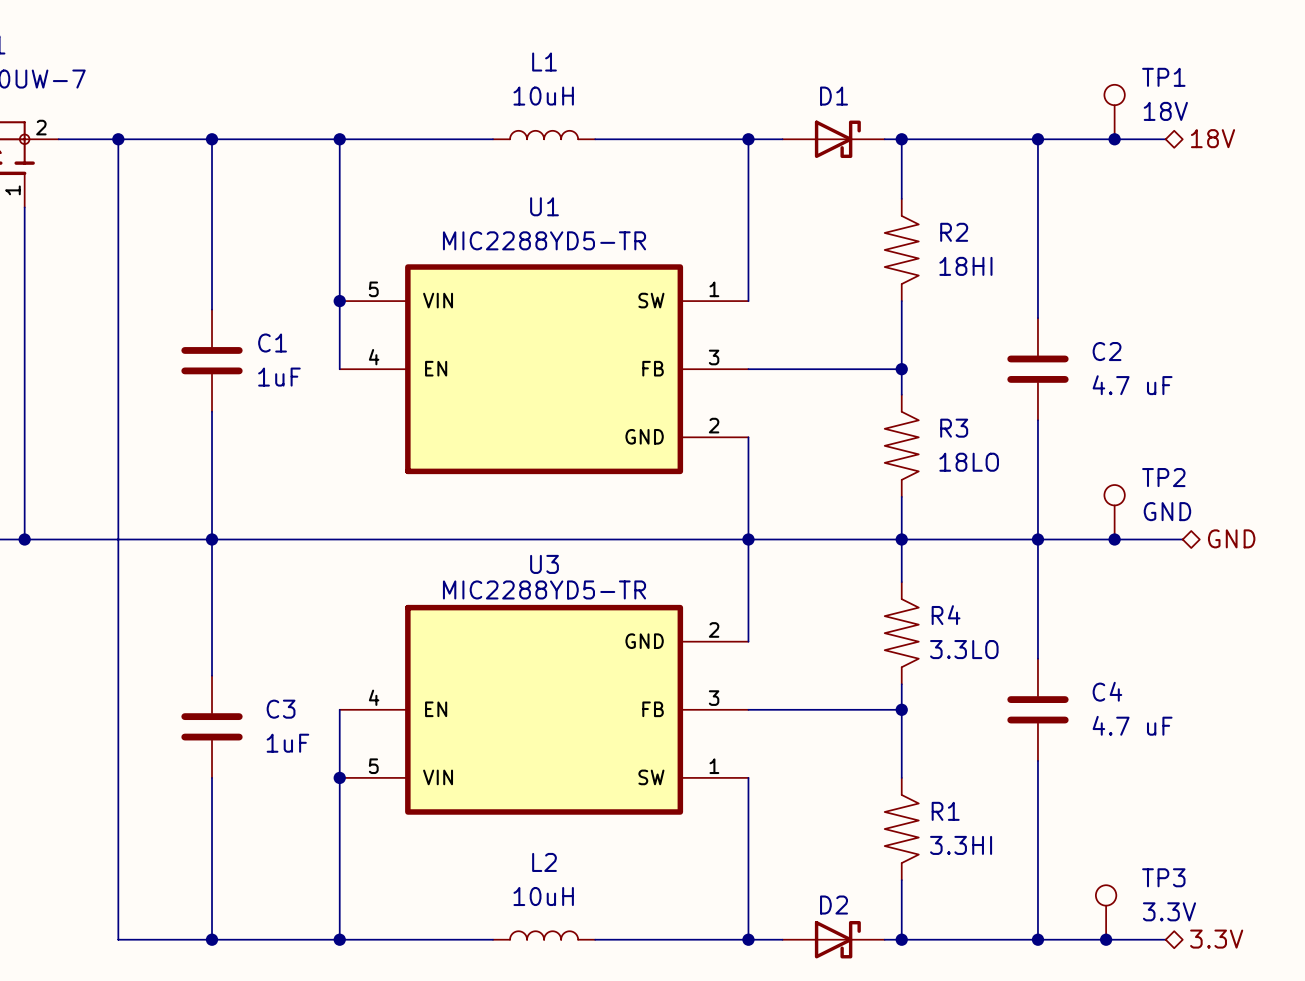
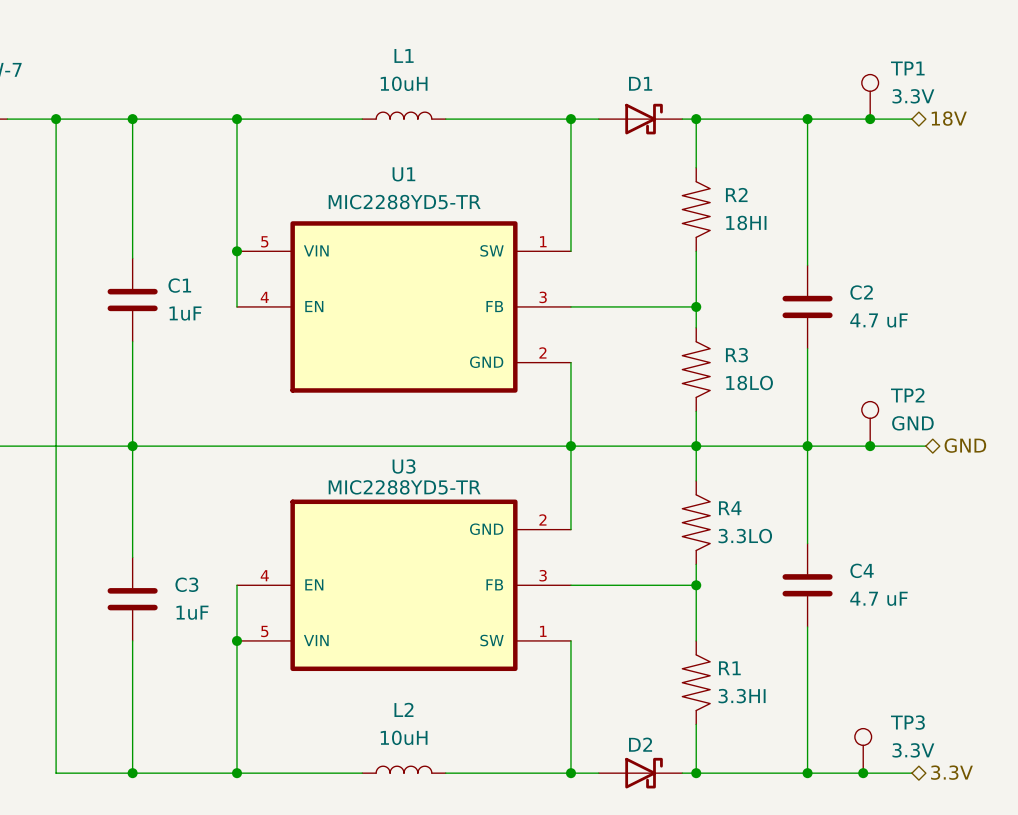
TP1 value: 18V (1165, 111) -> 3.3V (913, 96)

